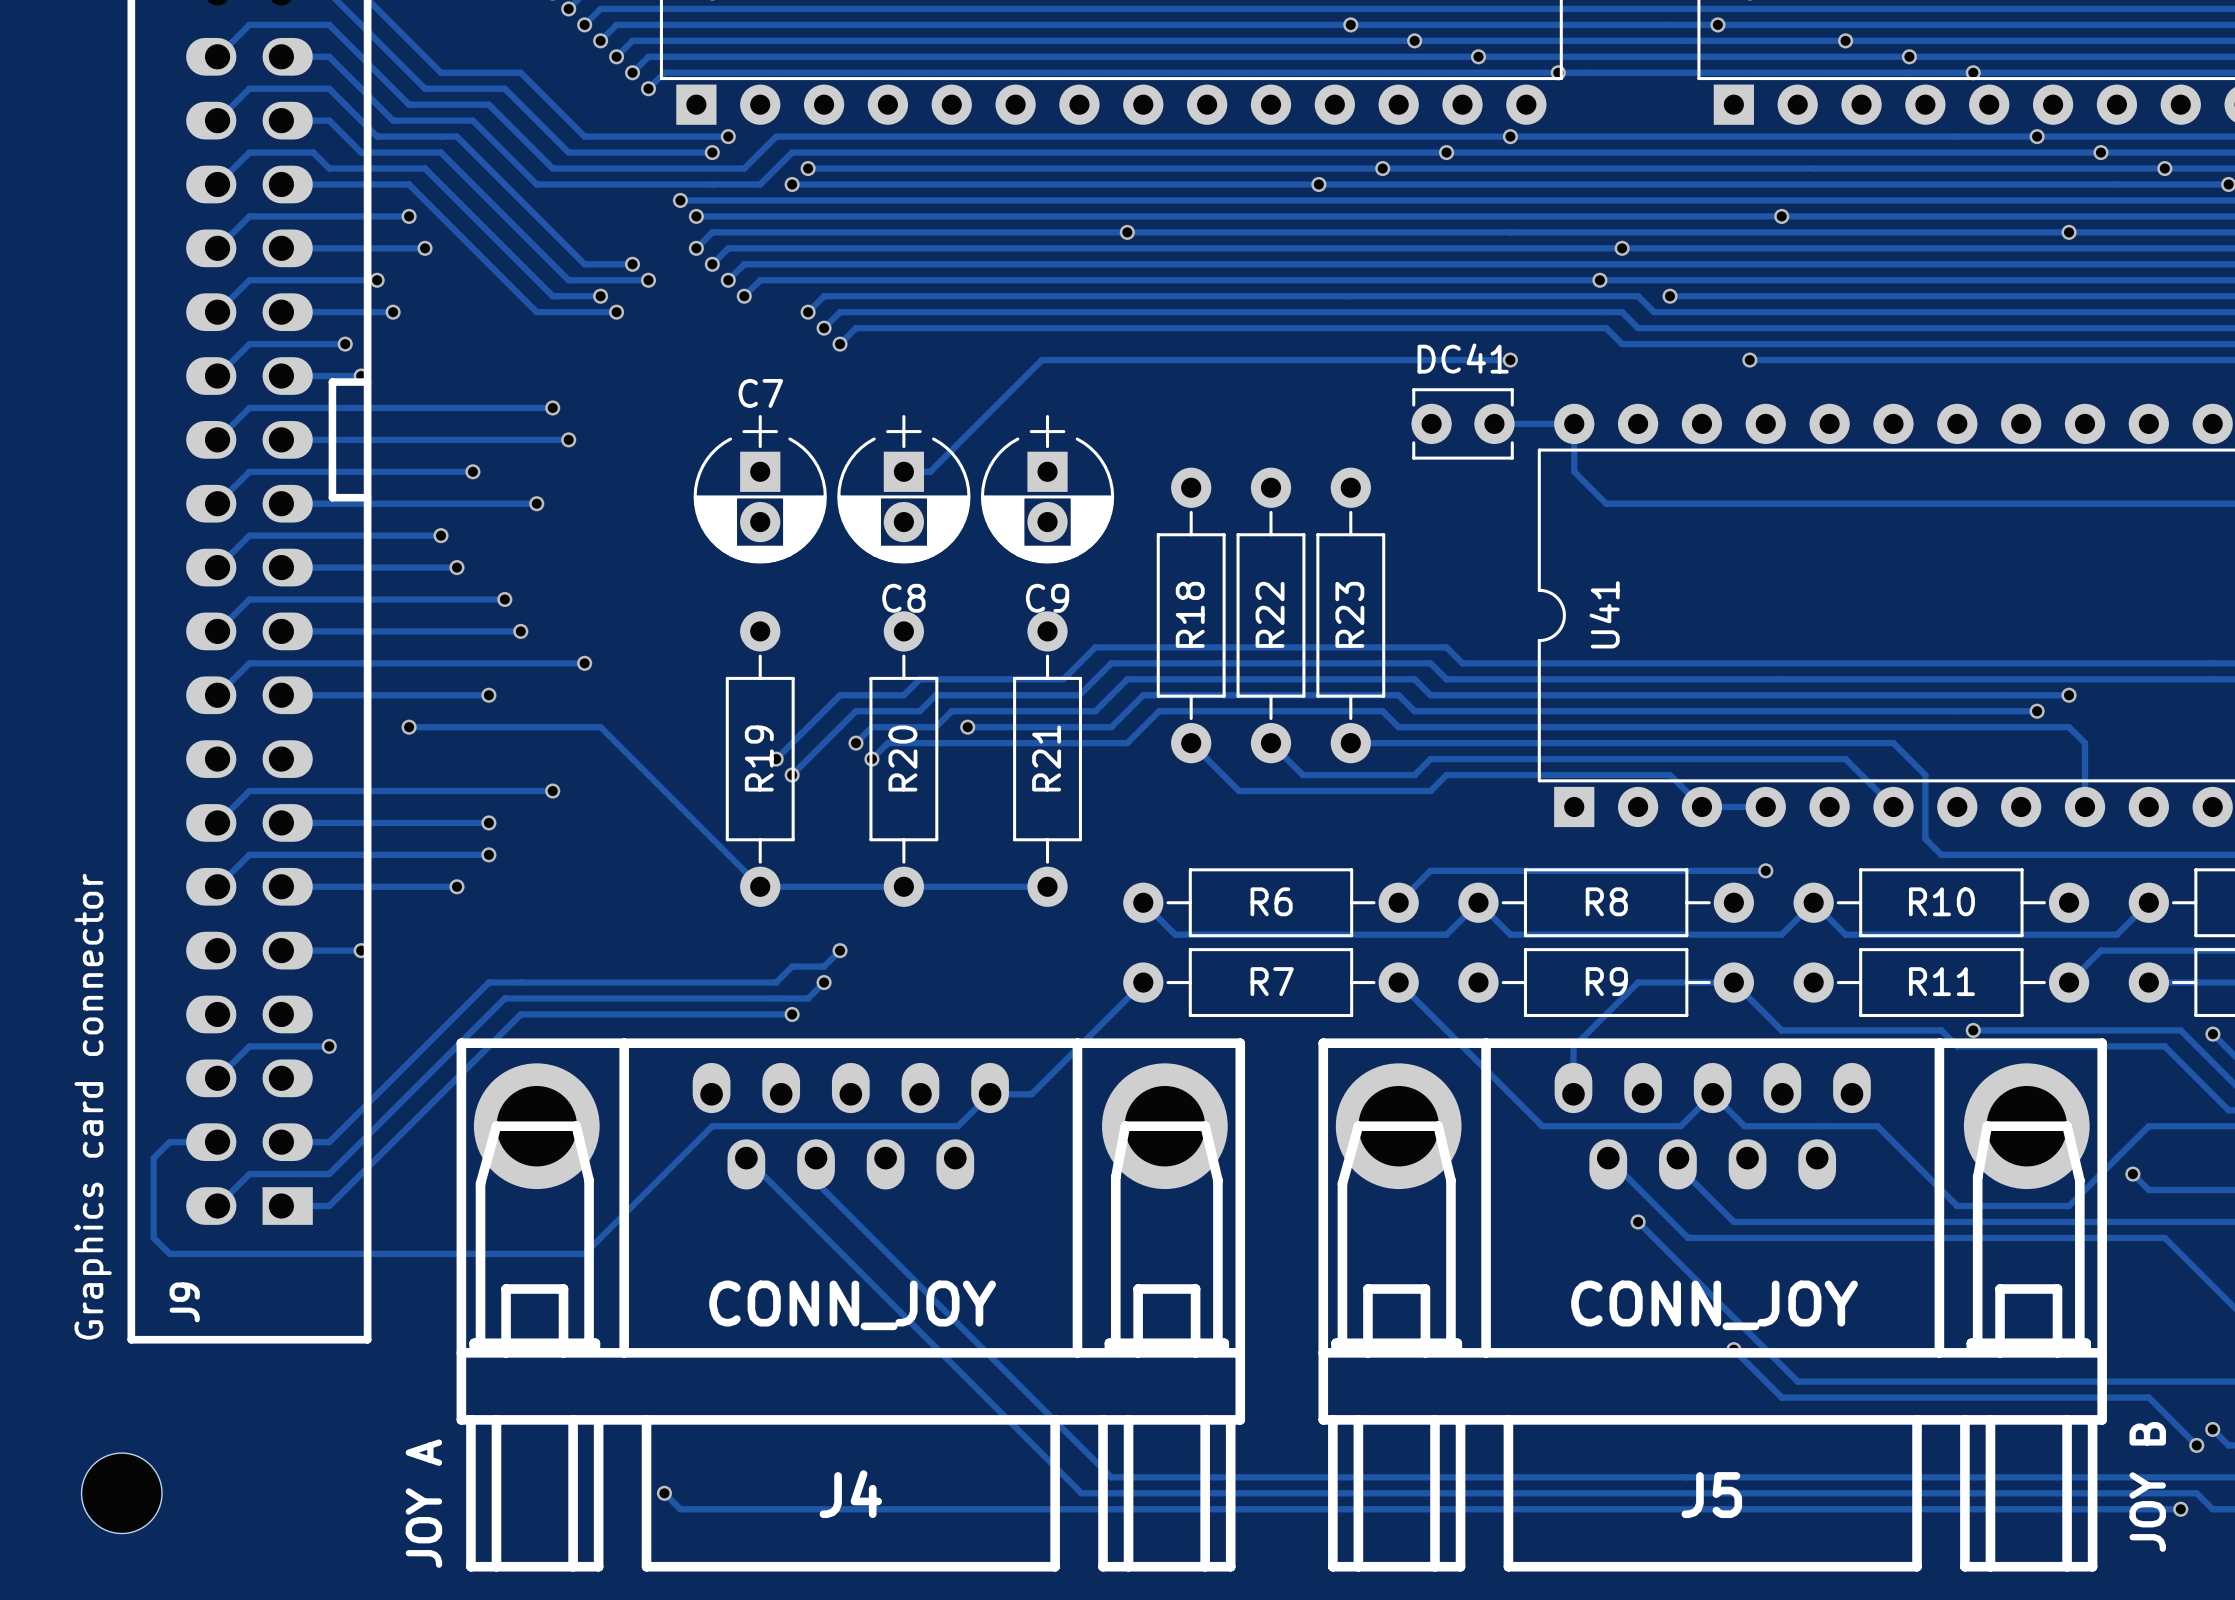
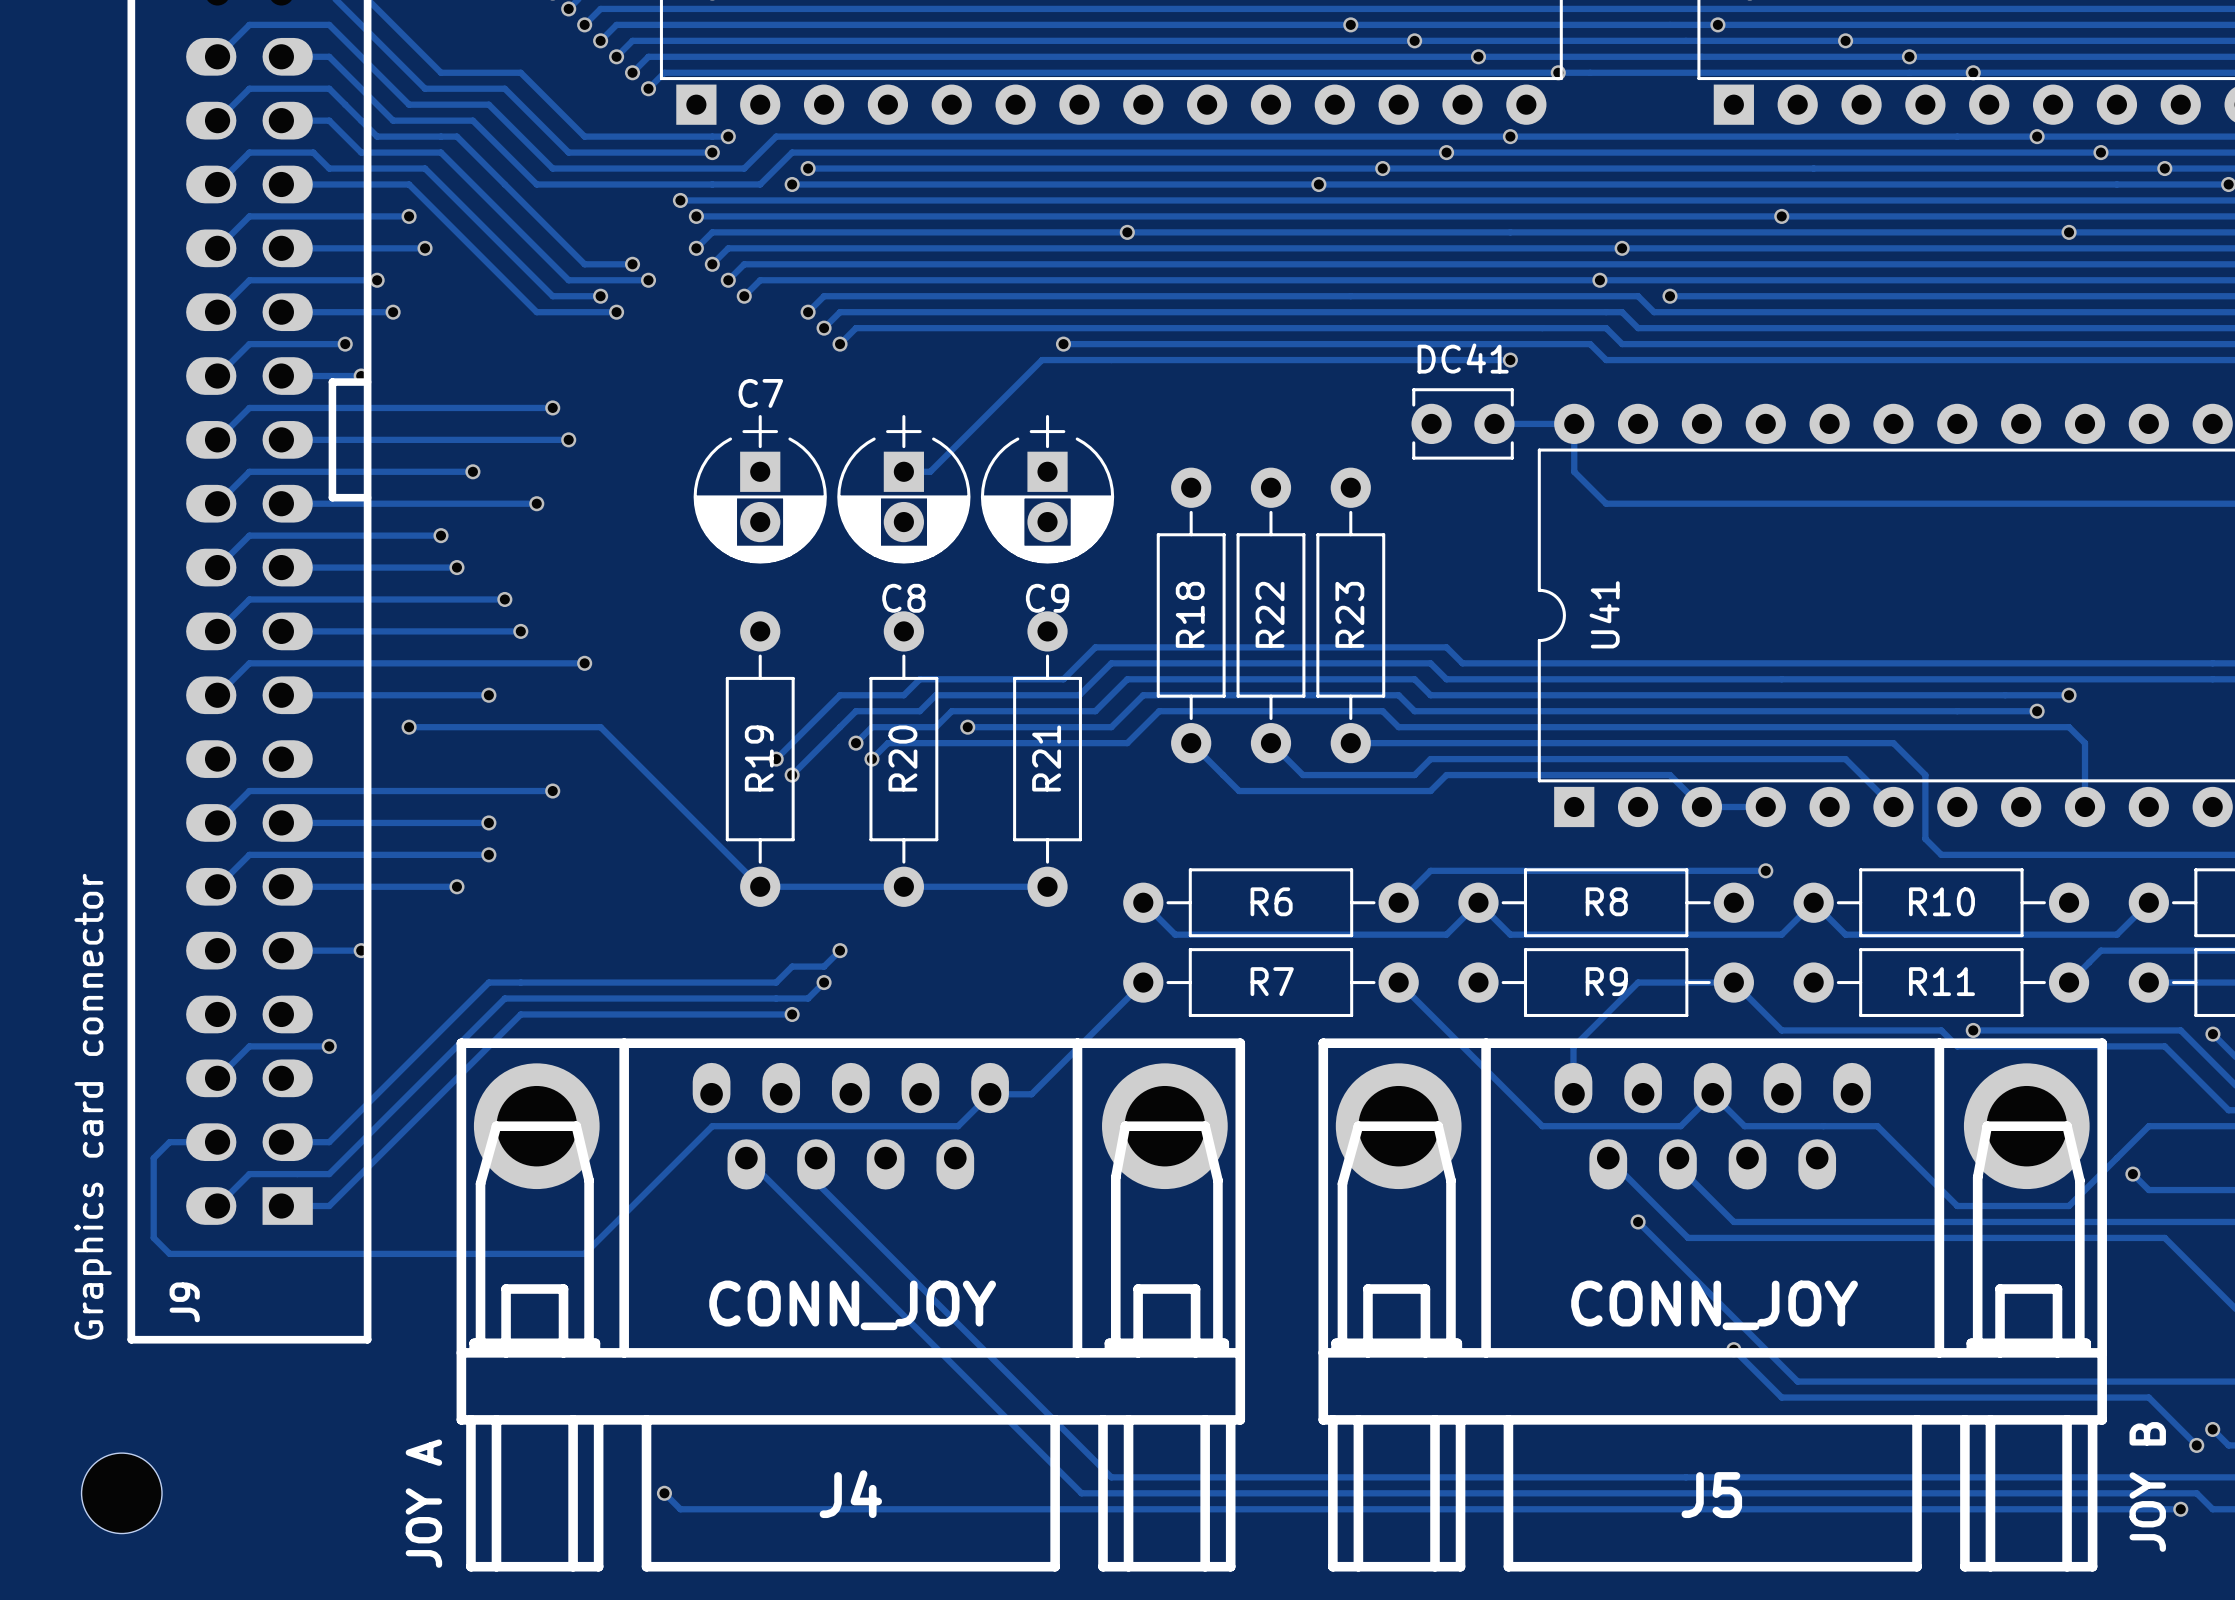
track: none -> (1063, 344) (1590, 344) (1606, 360) (1749, 360)
via: none -> (1063, 344)
via: (1749, 360) -> none

